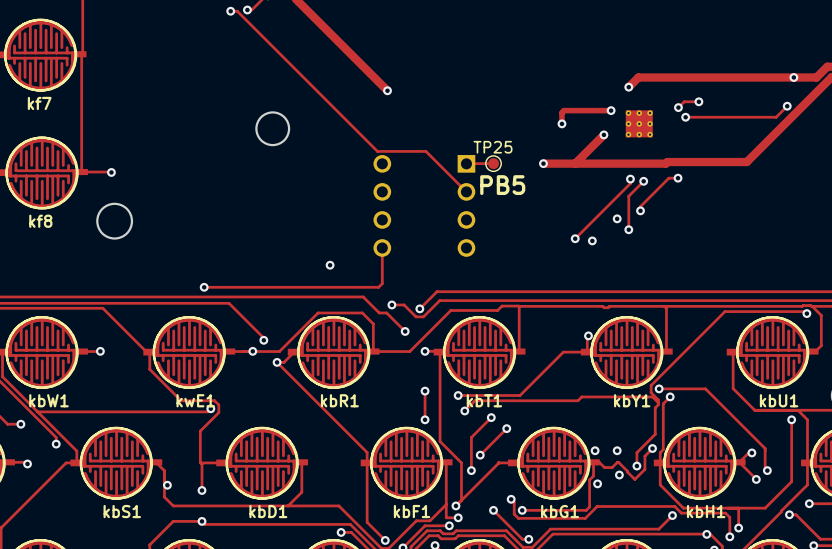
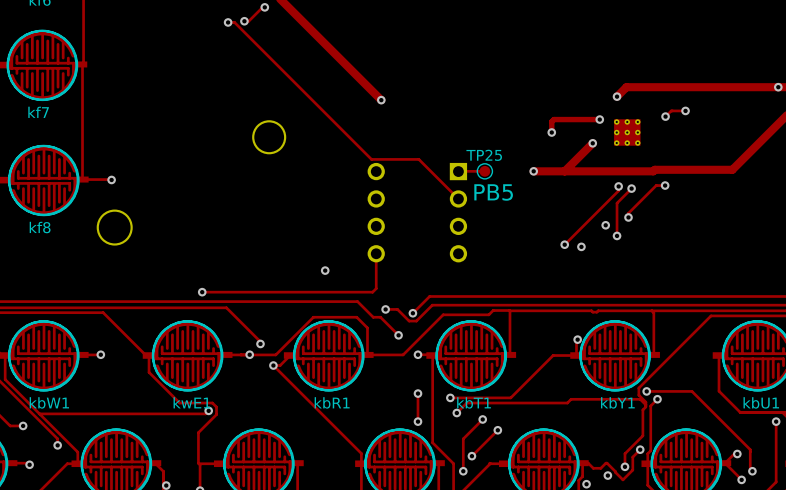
track: (787, 106) (776, 117) (685, 117) -> none
via: (787, 106) -> none
via: (685, 117) -> none
via: (595, 450) -> none
via: (617, 450) -> none

